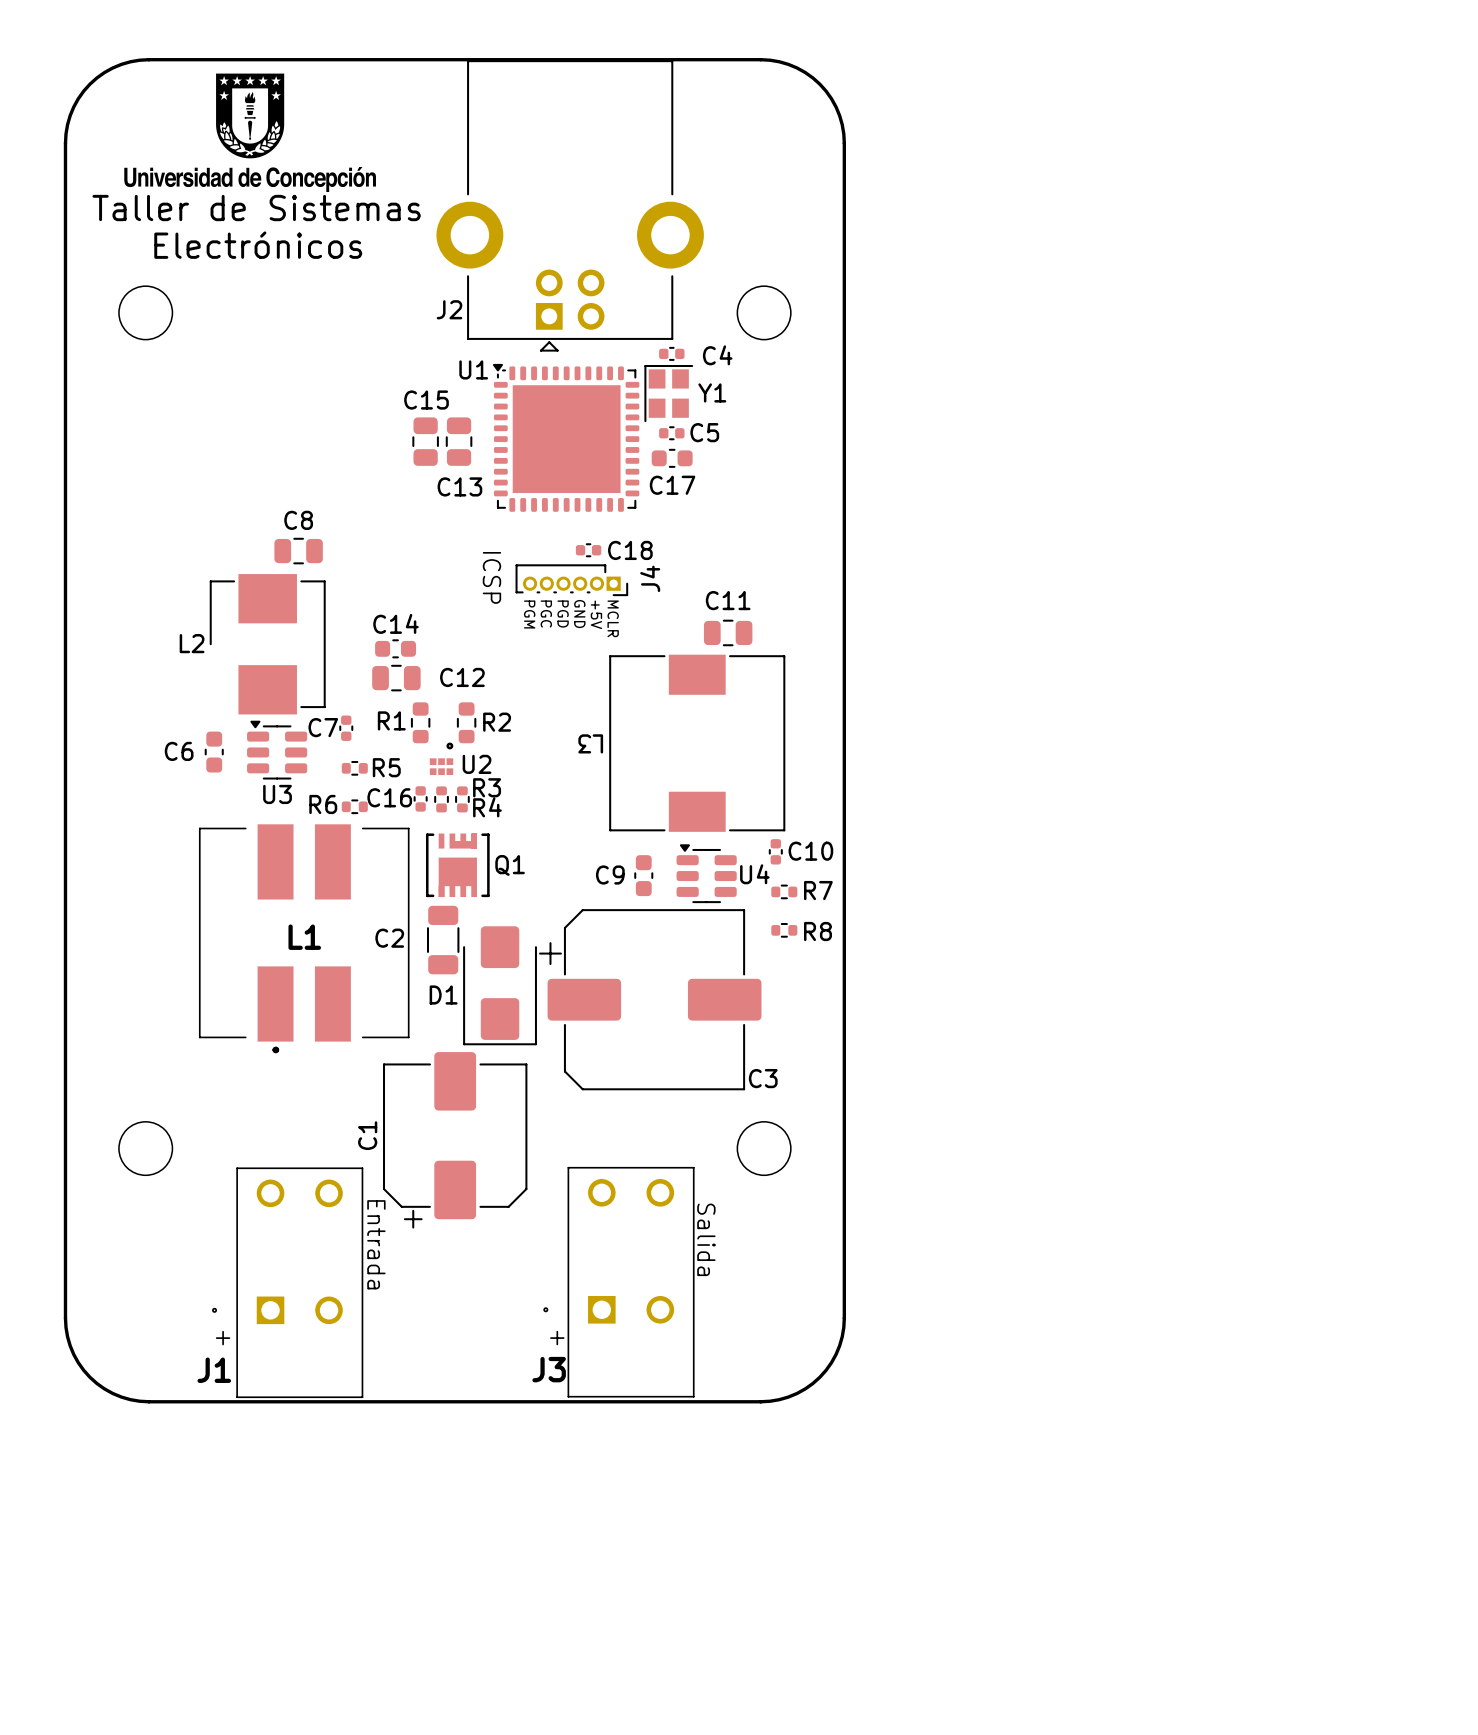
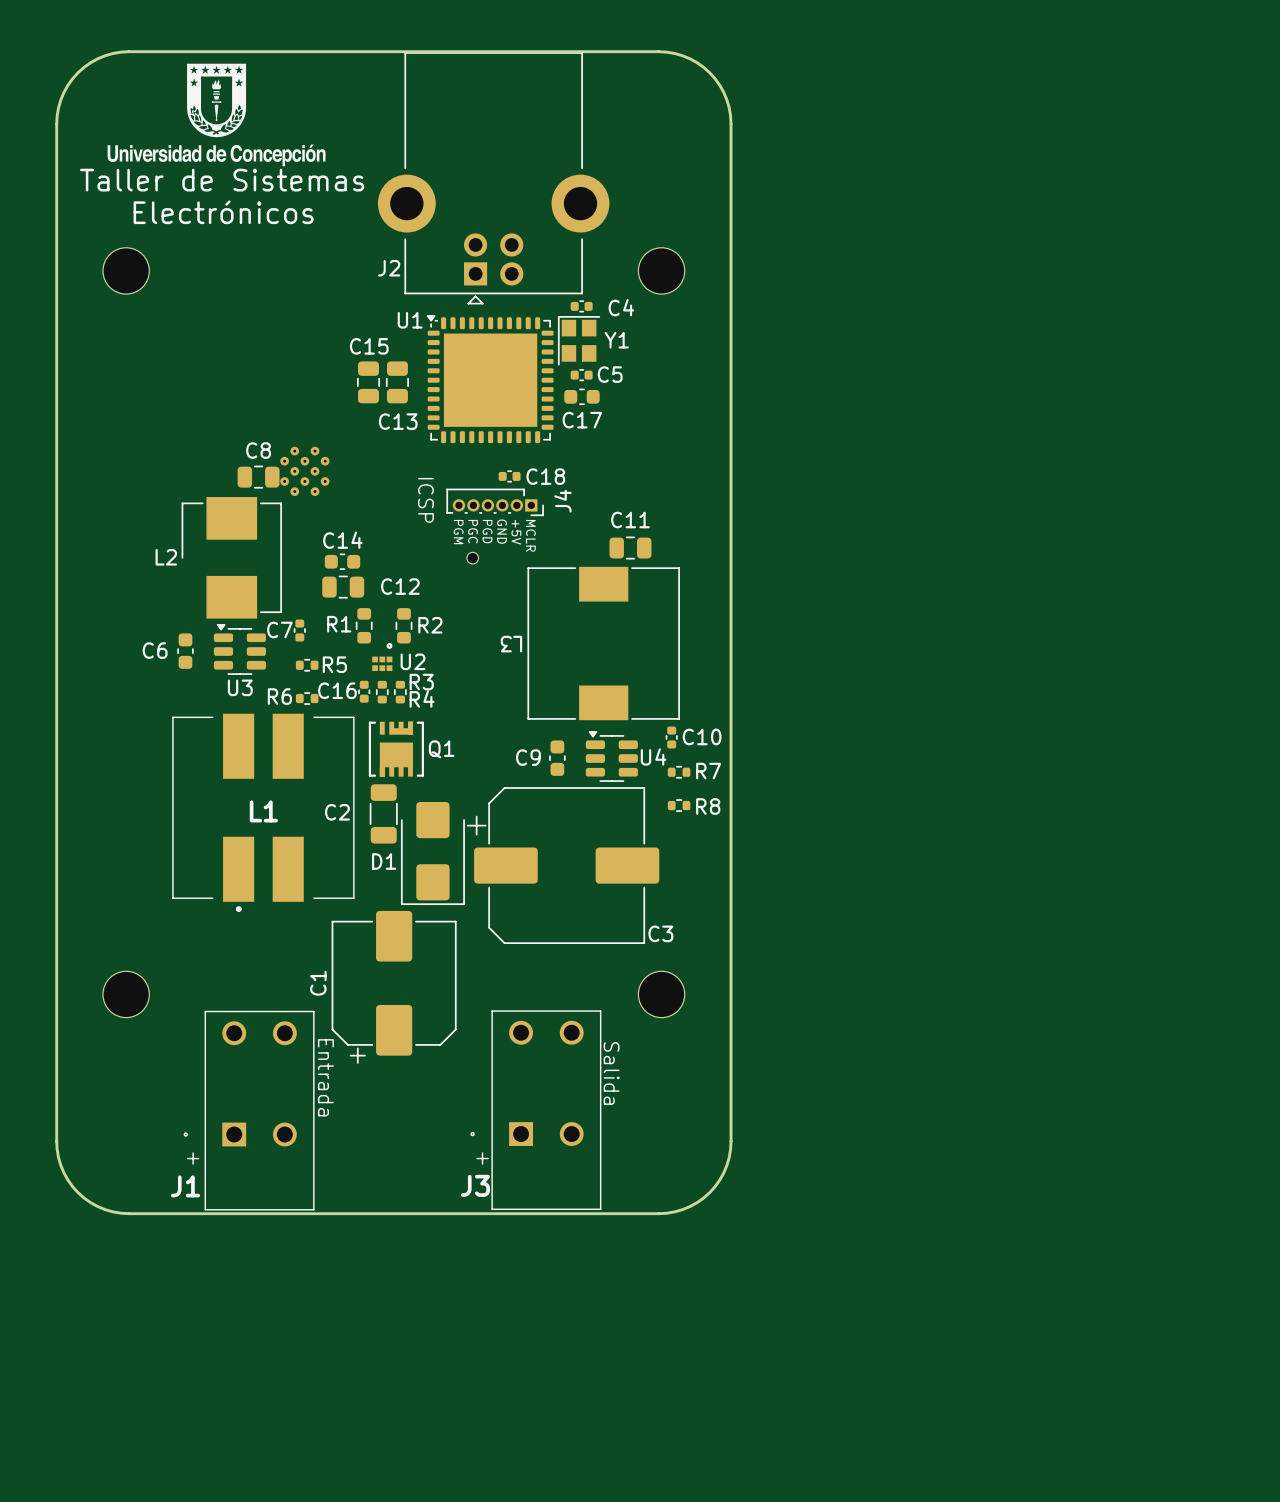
part: none -> (304, 471)
part: none -> (472, 558)

